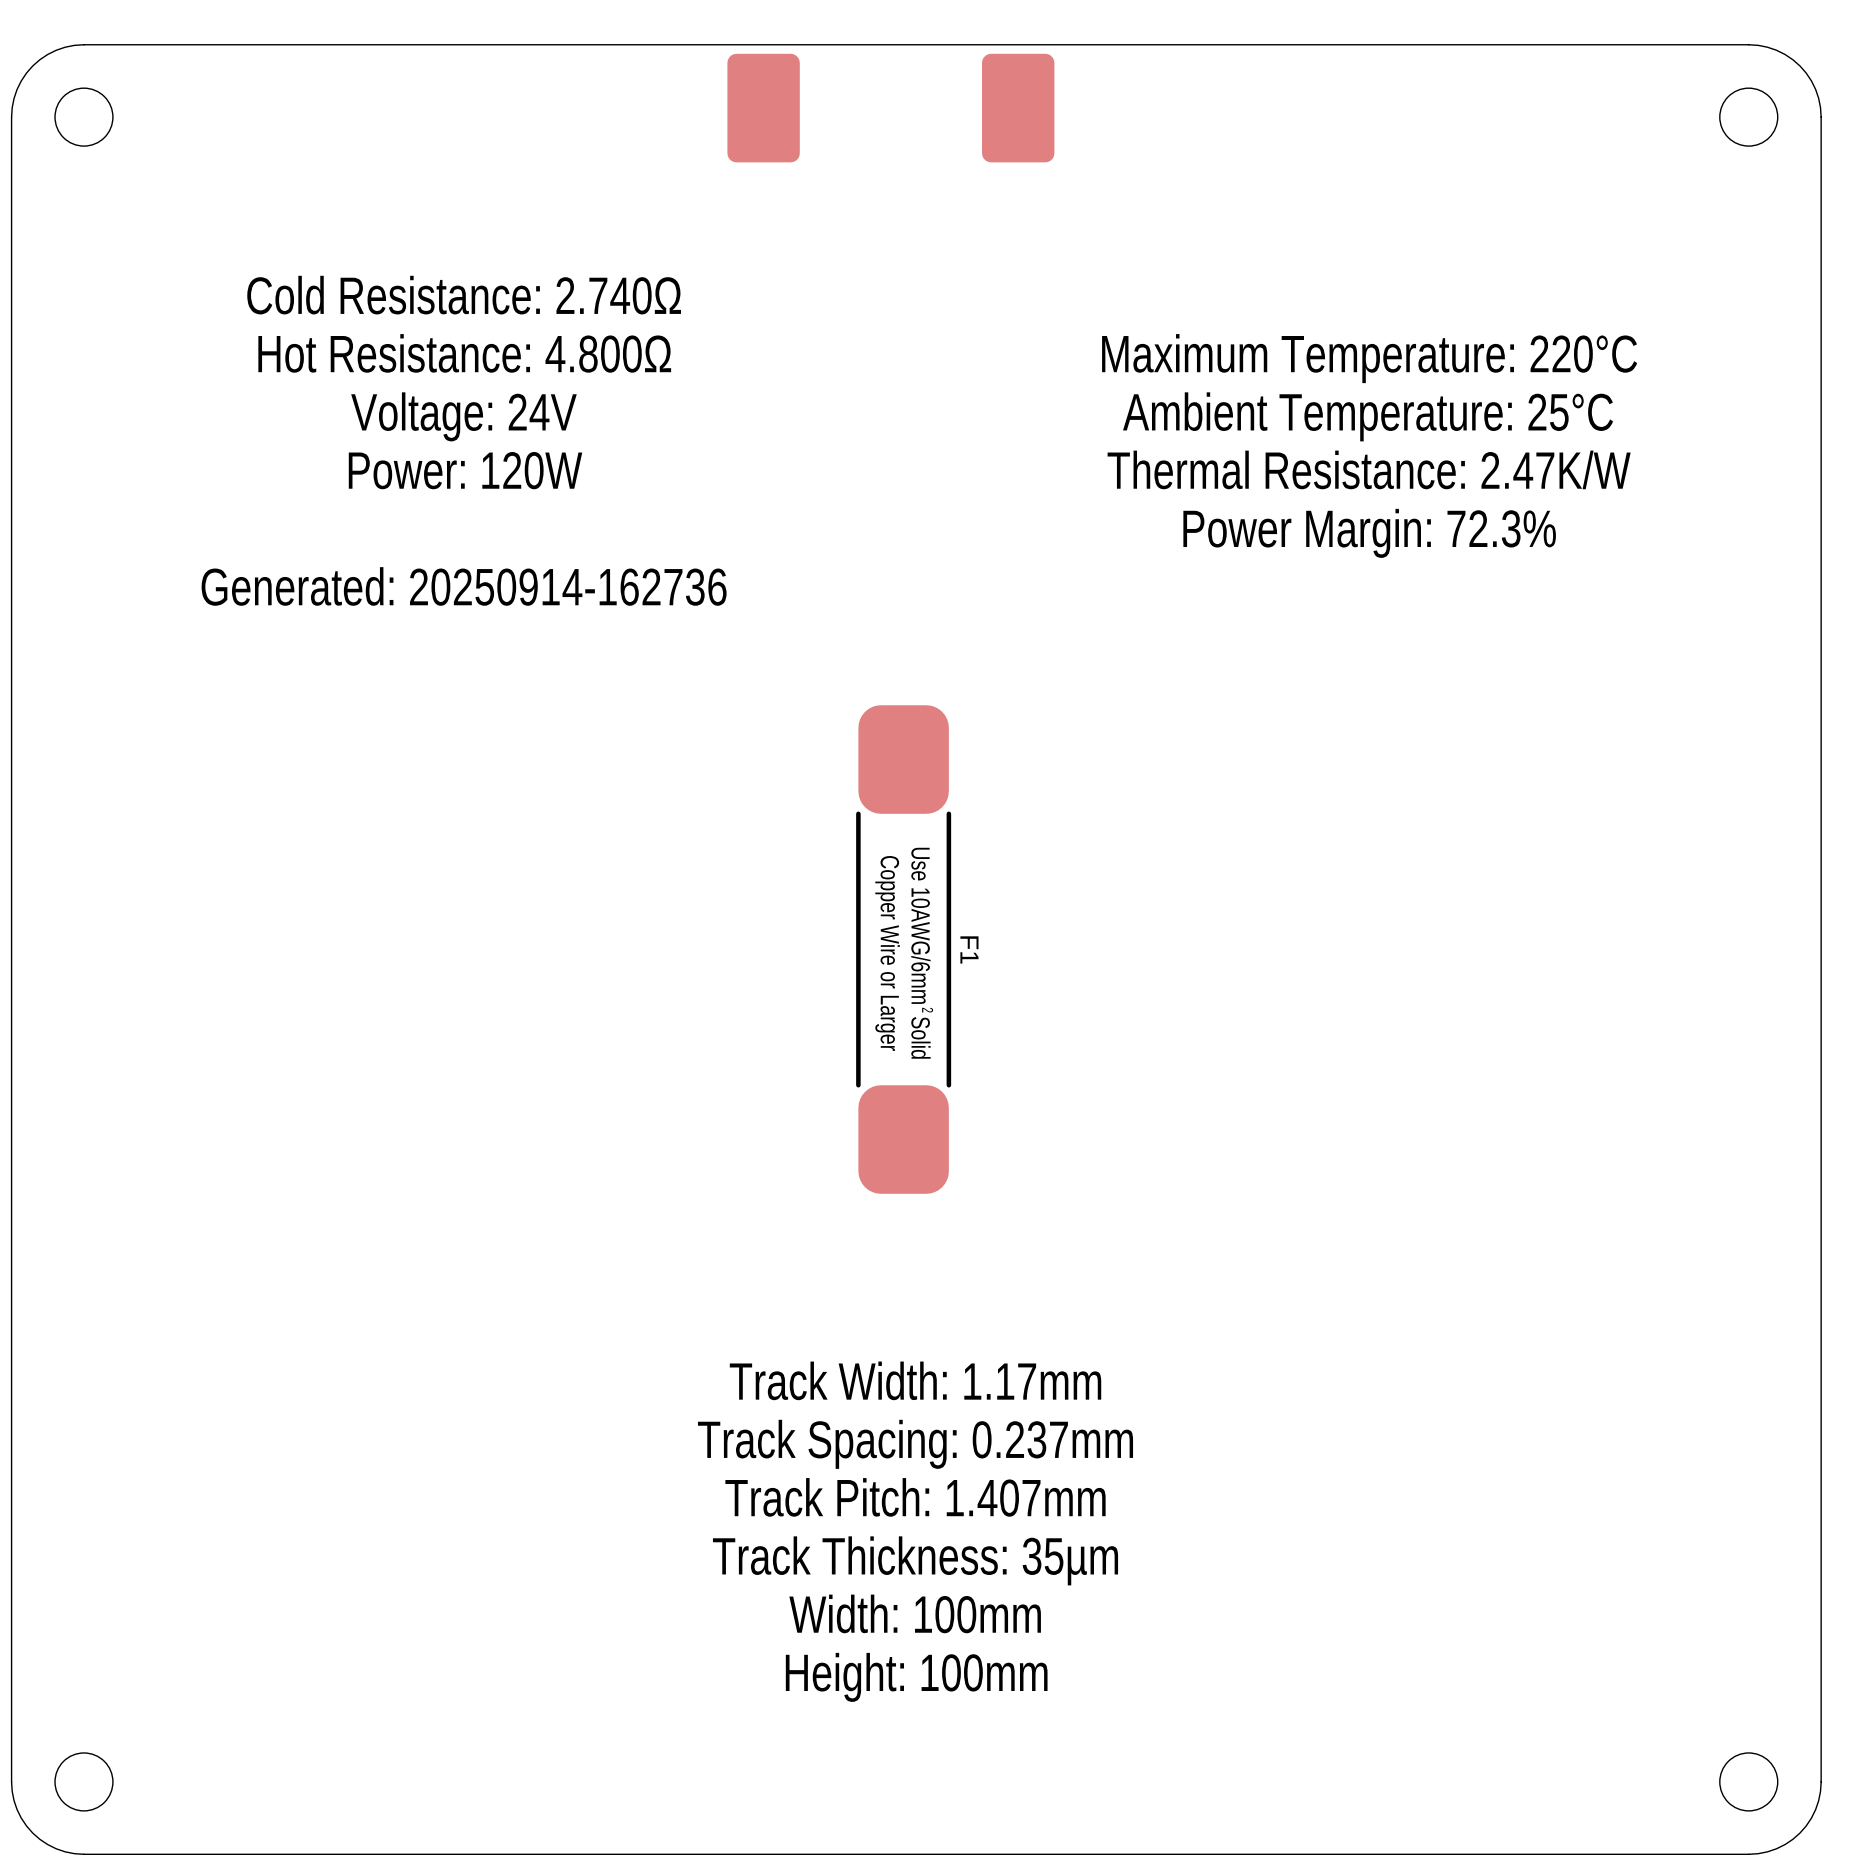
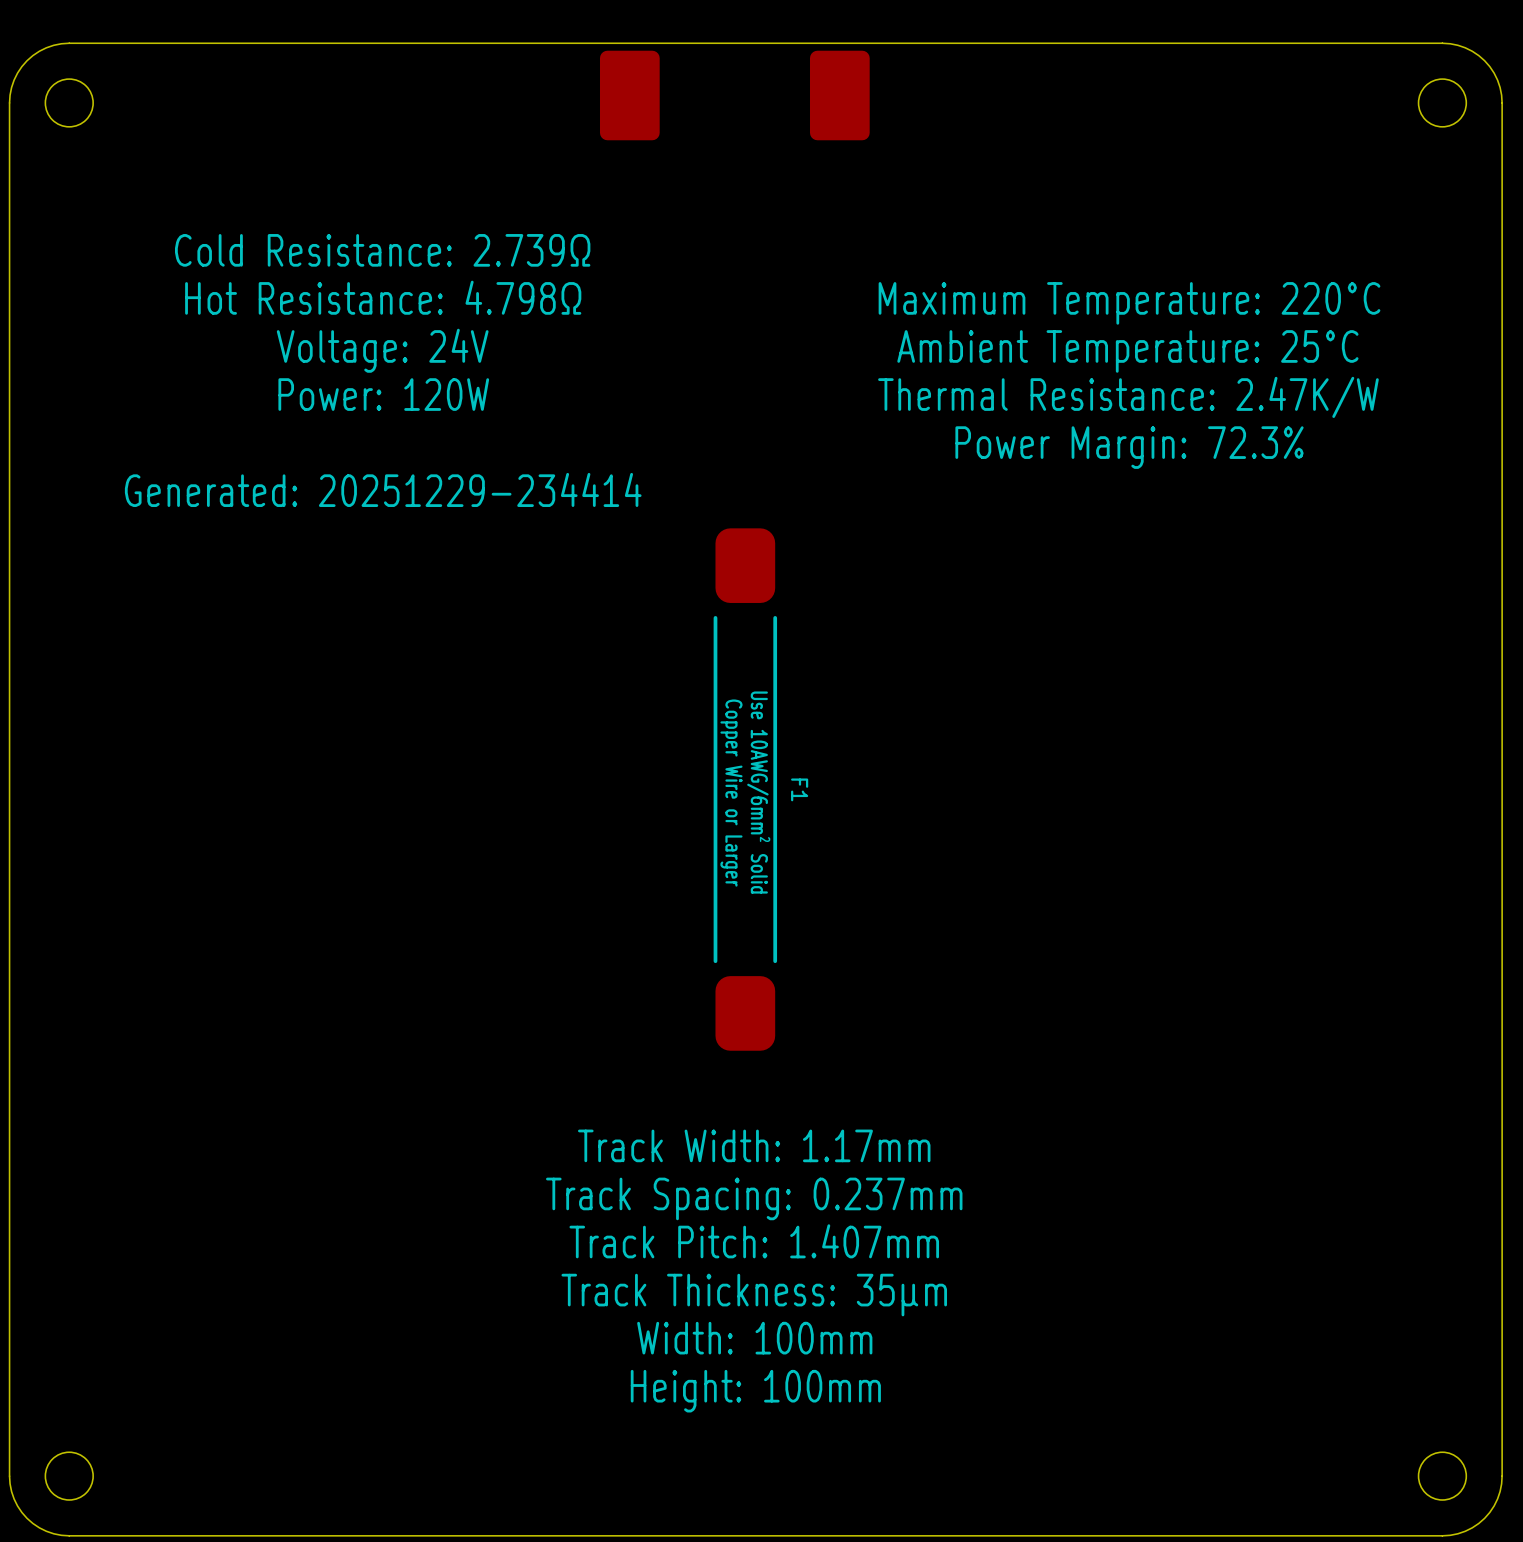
text: Cold Resistance: 2.740Ω (464, 295) -> Cold Resistance: 2.739Ω (382, 250)
text: Hot Resistance: 4.800Ω (464, 353) -> Hot Resistance: 4.798Ω (383, 297)
text: Generated: 20250914-162736 (464, 586) -> Generated: 20251229-234414 (383, 489)
F1 footprint: [856, 705, 952, 1194] -> [713, 528, 778, 1051]

